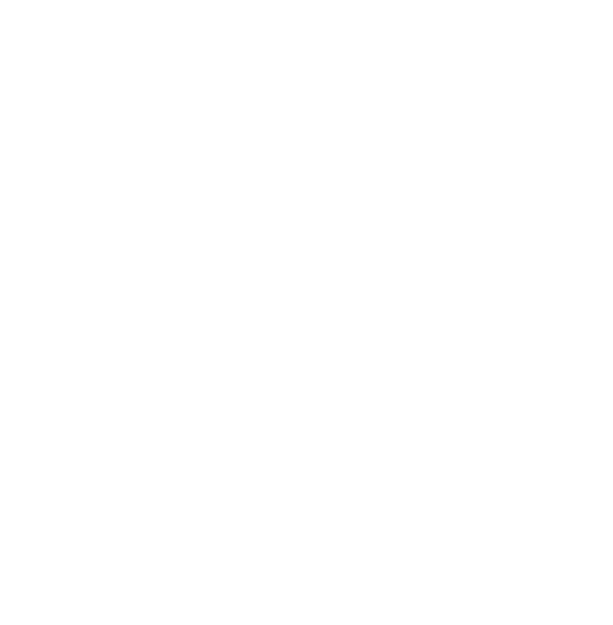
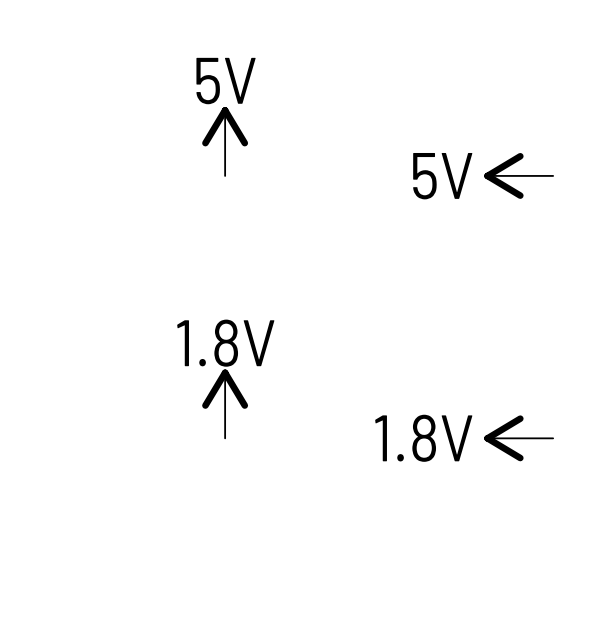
power symbol: none -> 5V (225, 141)
power symbol: none -> 5V (518, 175)
power symbol: none -> 1.8V (225, 403)
power symbol: none -> 1.8V (518, 438)

